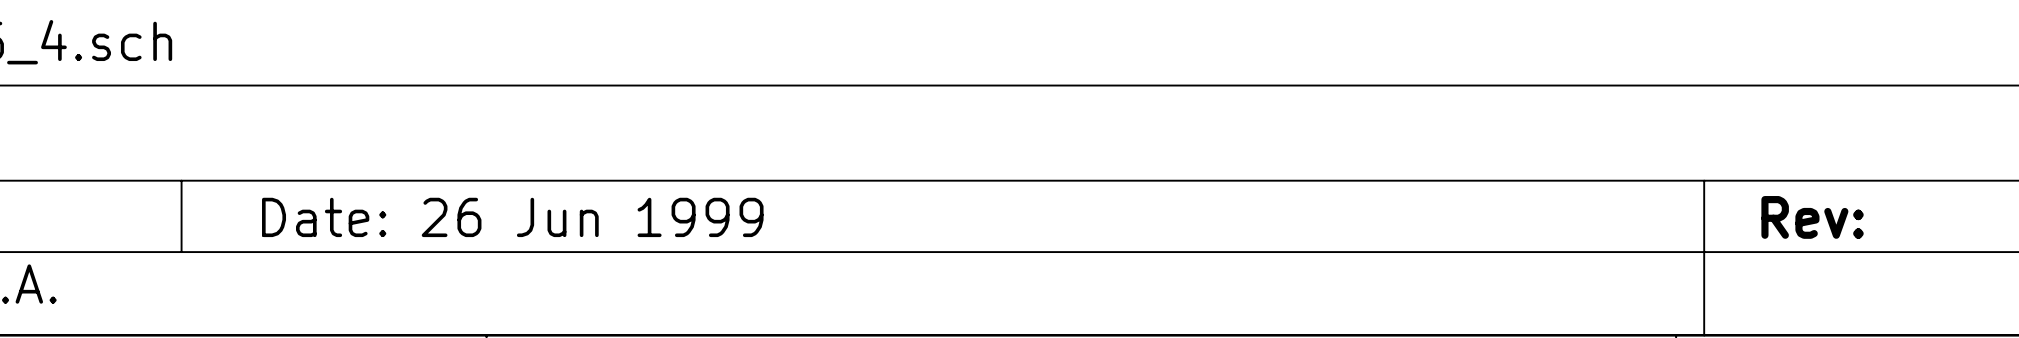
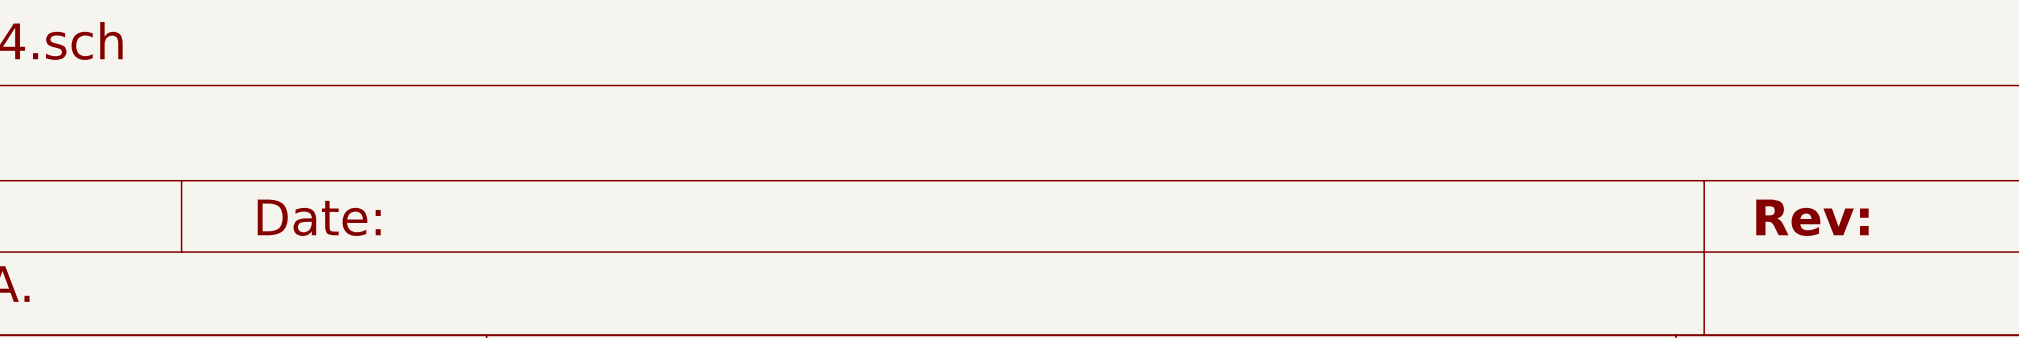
title block: Date: 26 Jun 1999 (512, 217) -> Date: (319, 217)

